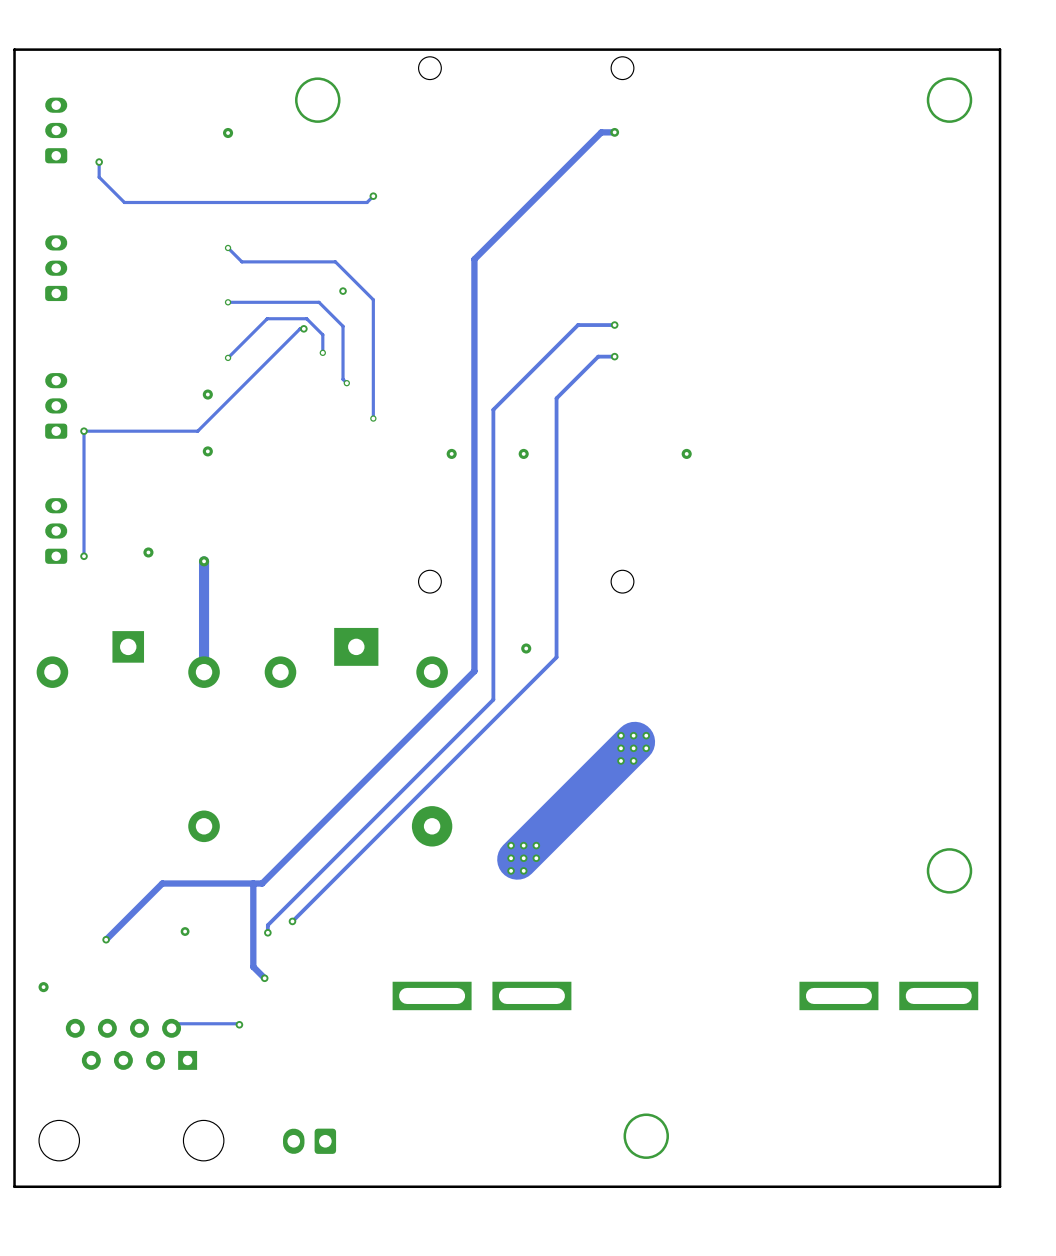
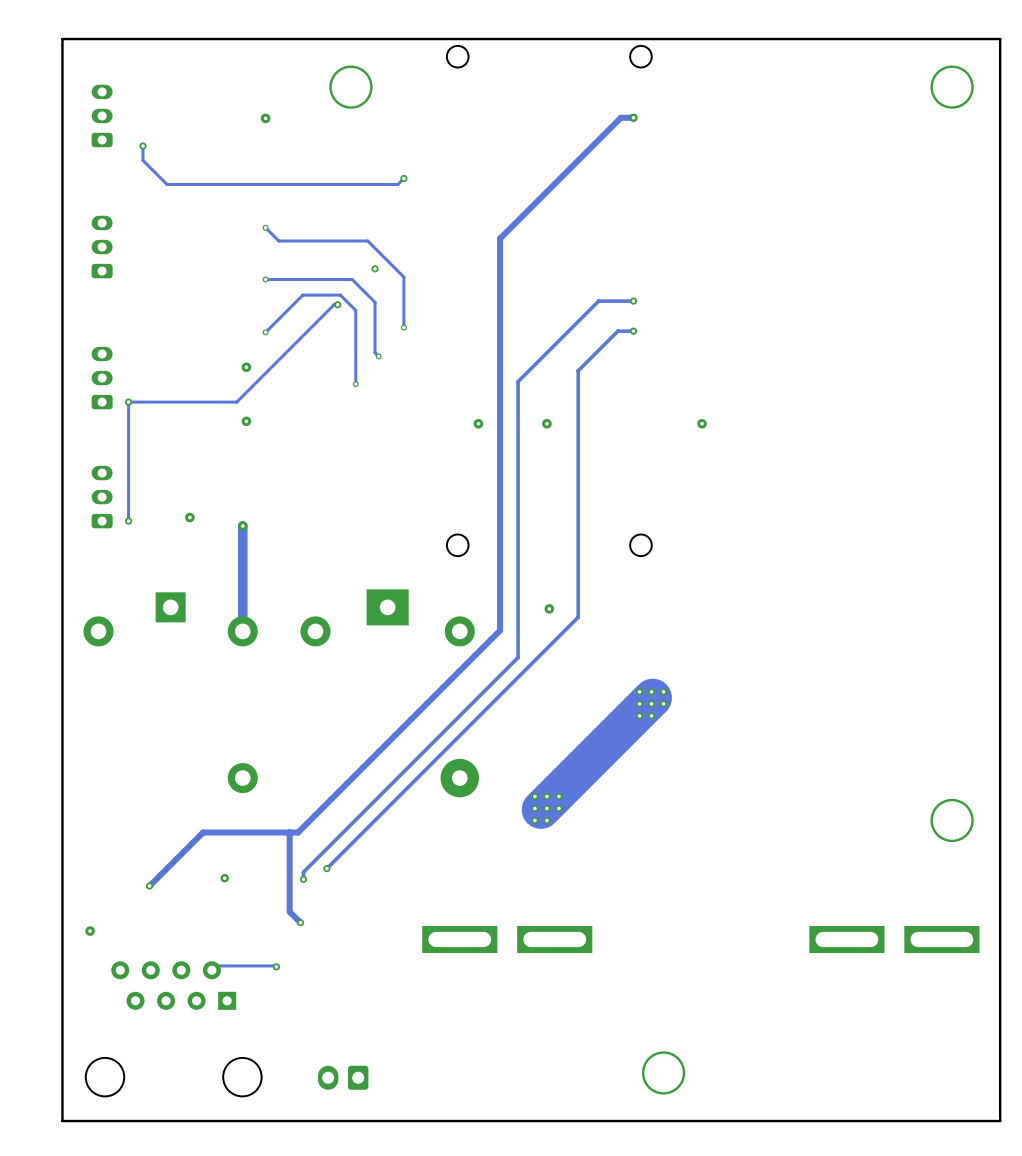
track: none -> (355, 327) (355, 384)
via: (322, 352) -> none
track: (373, 352) (373, 418) -> none
via: none -> (403, 327)
via: none -> (355, 384)
via: (373, 418) -> none

